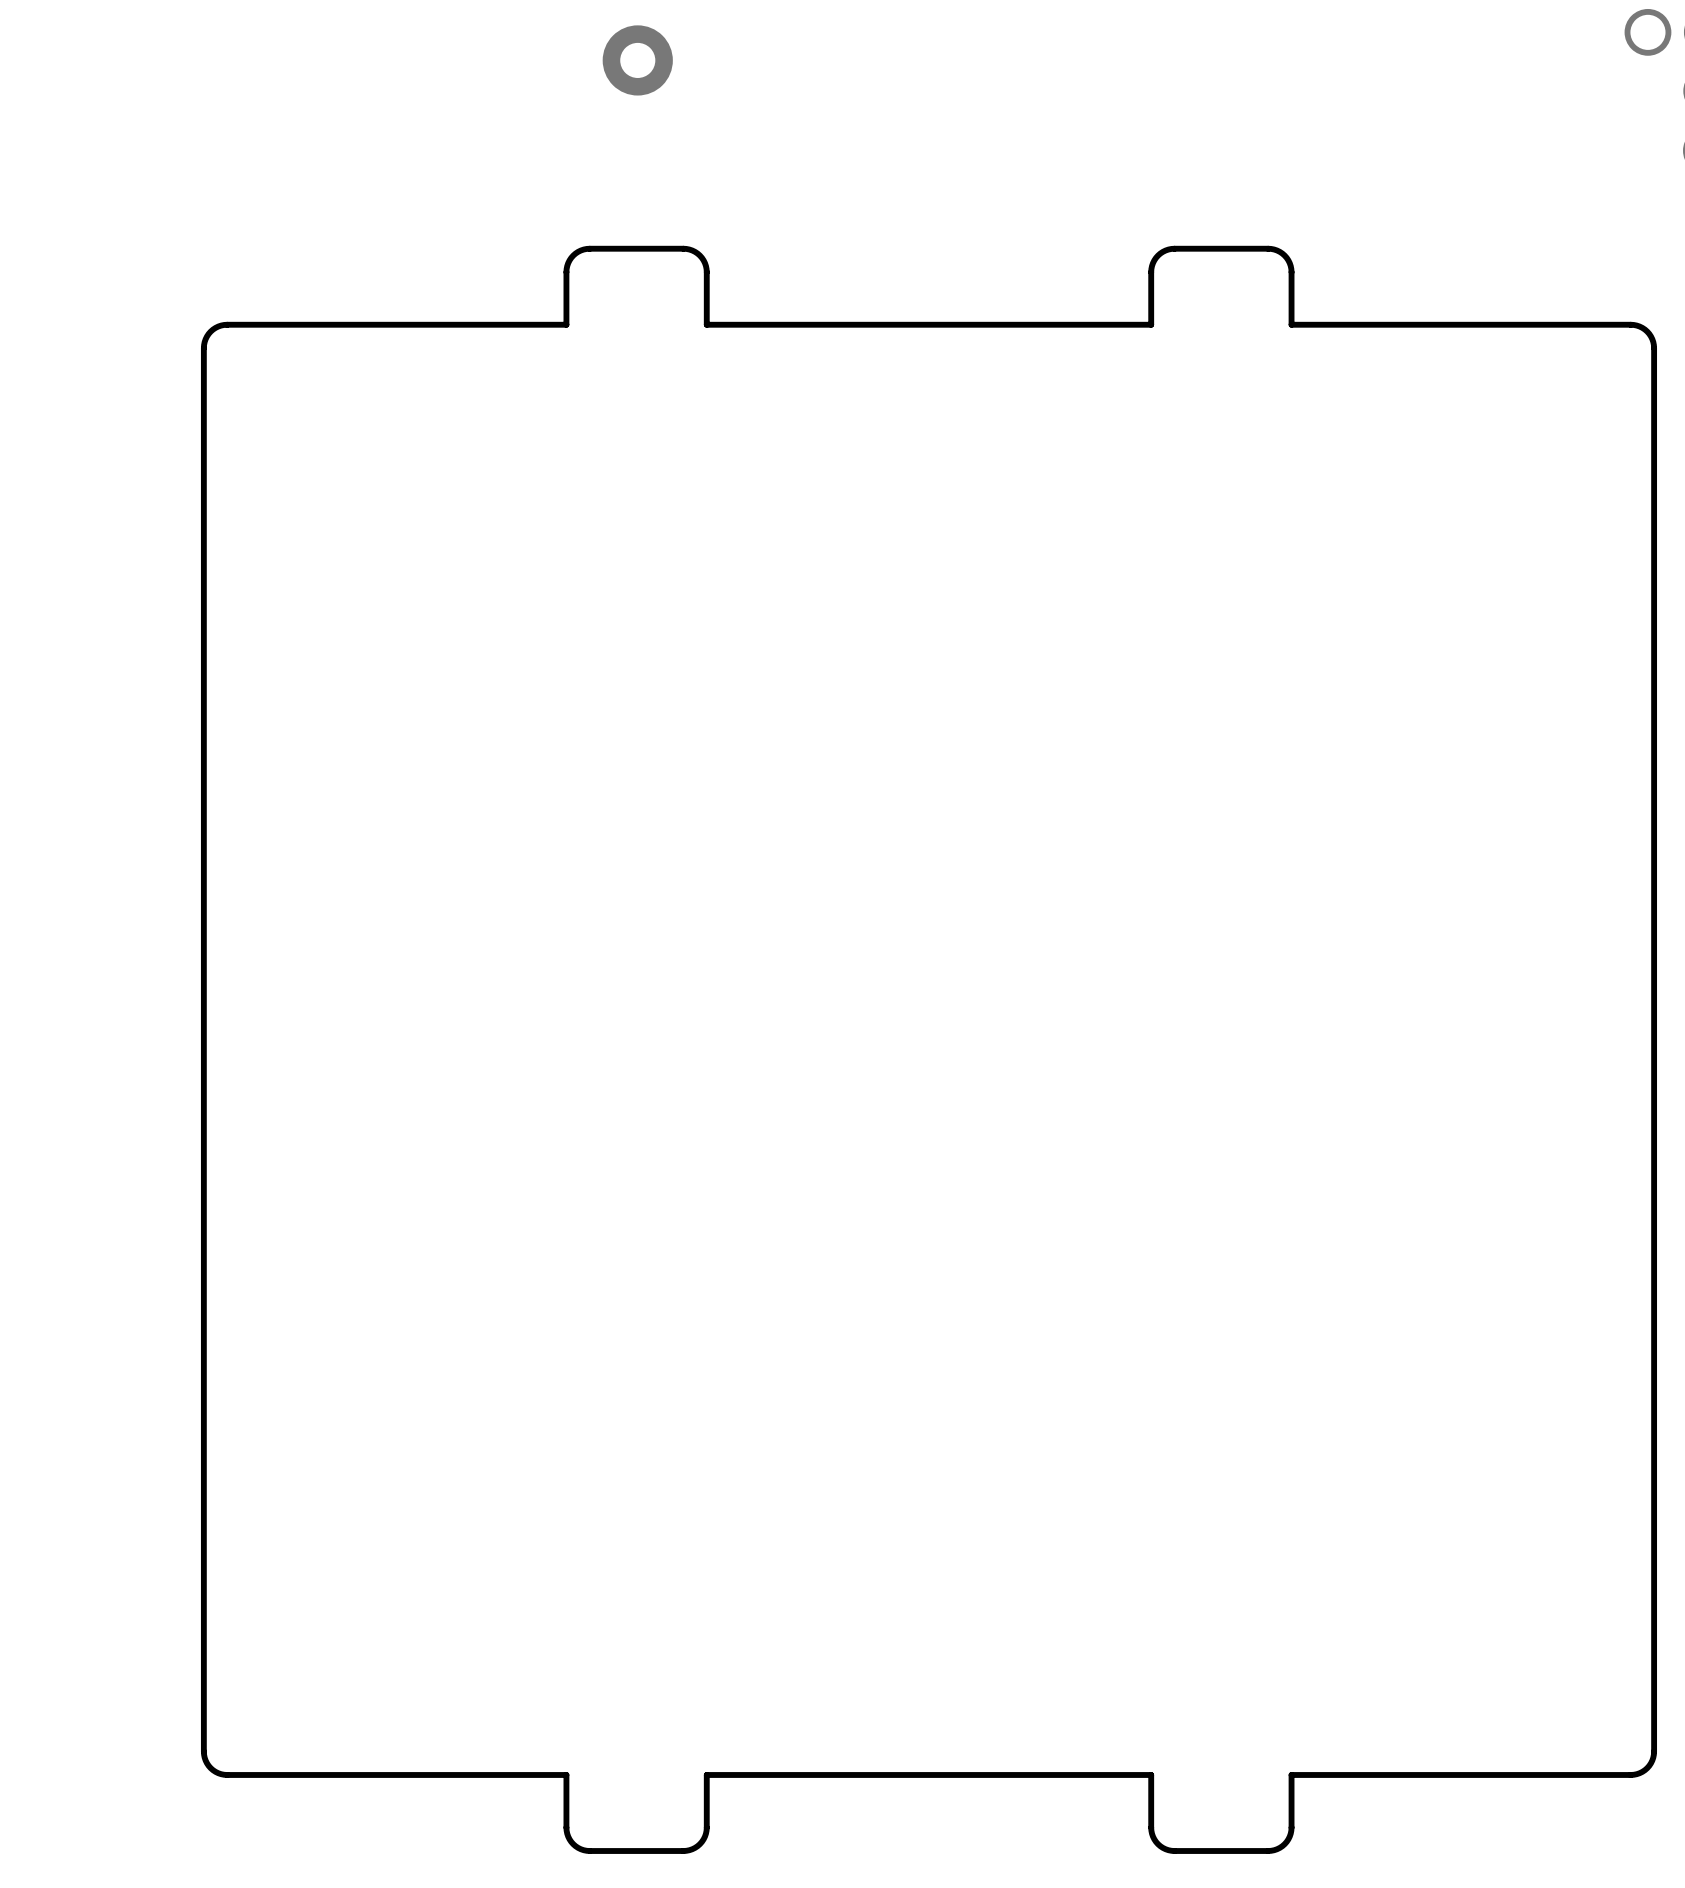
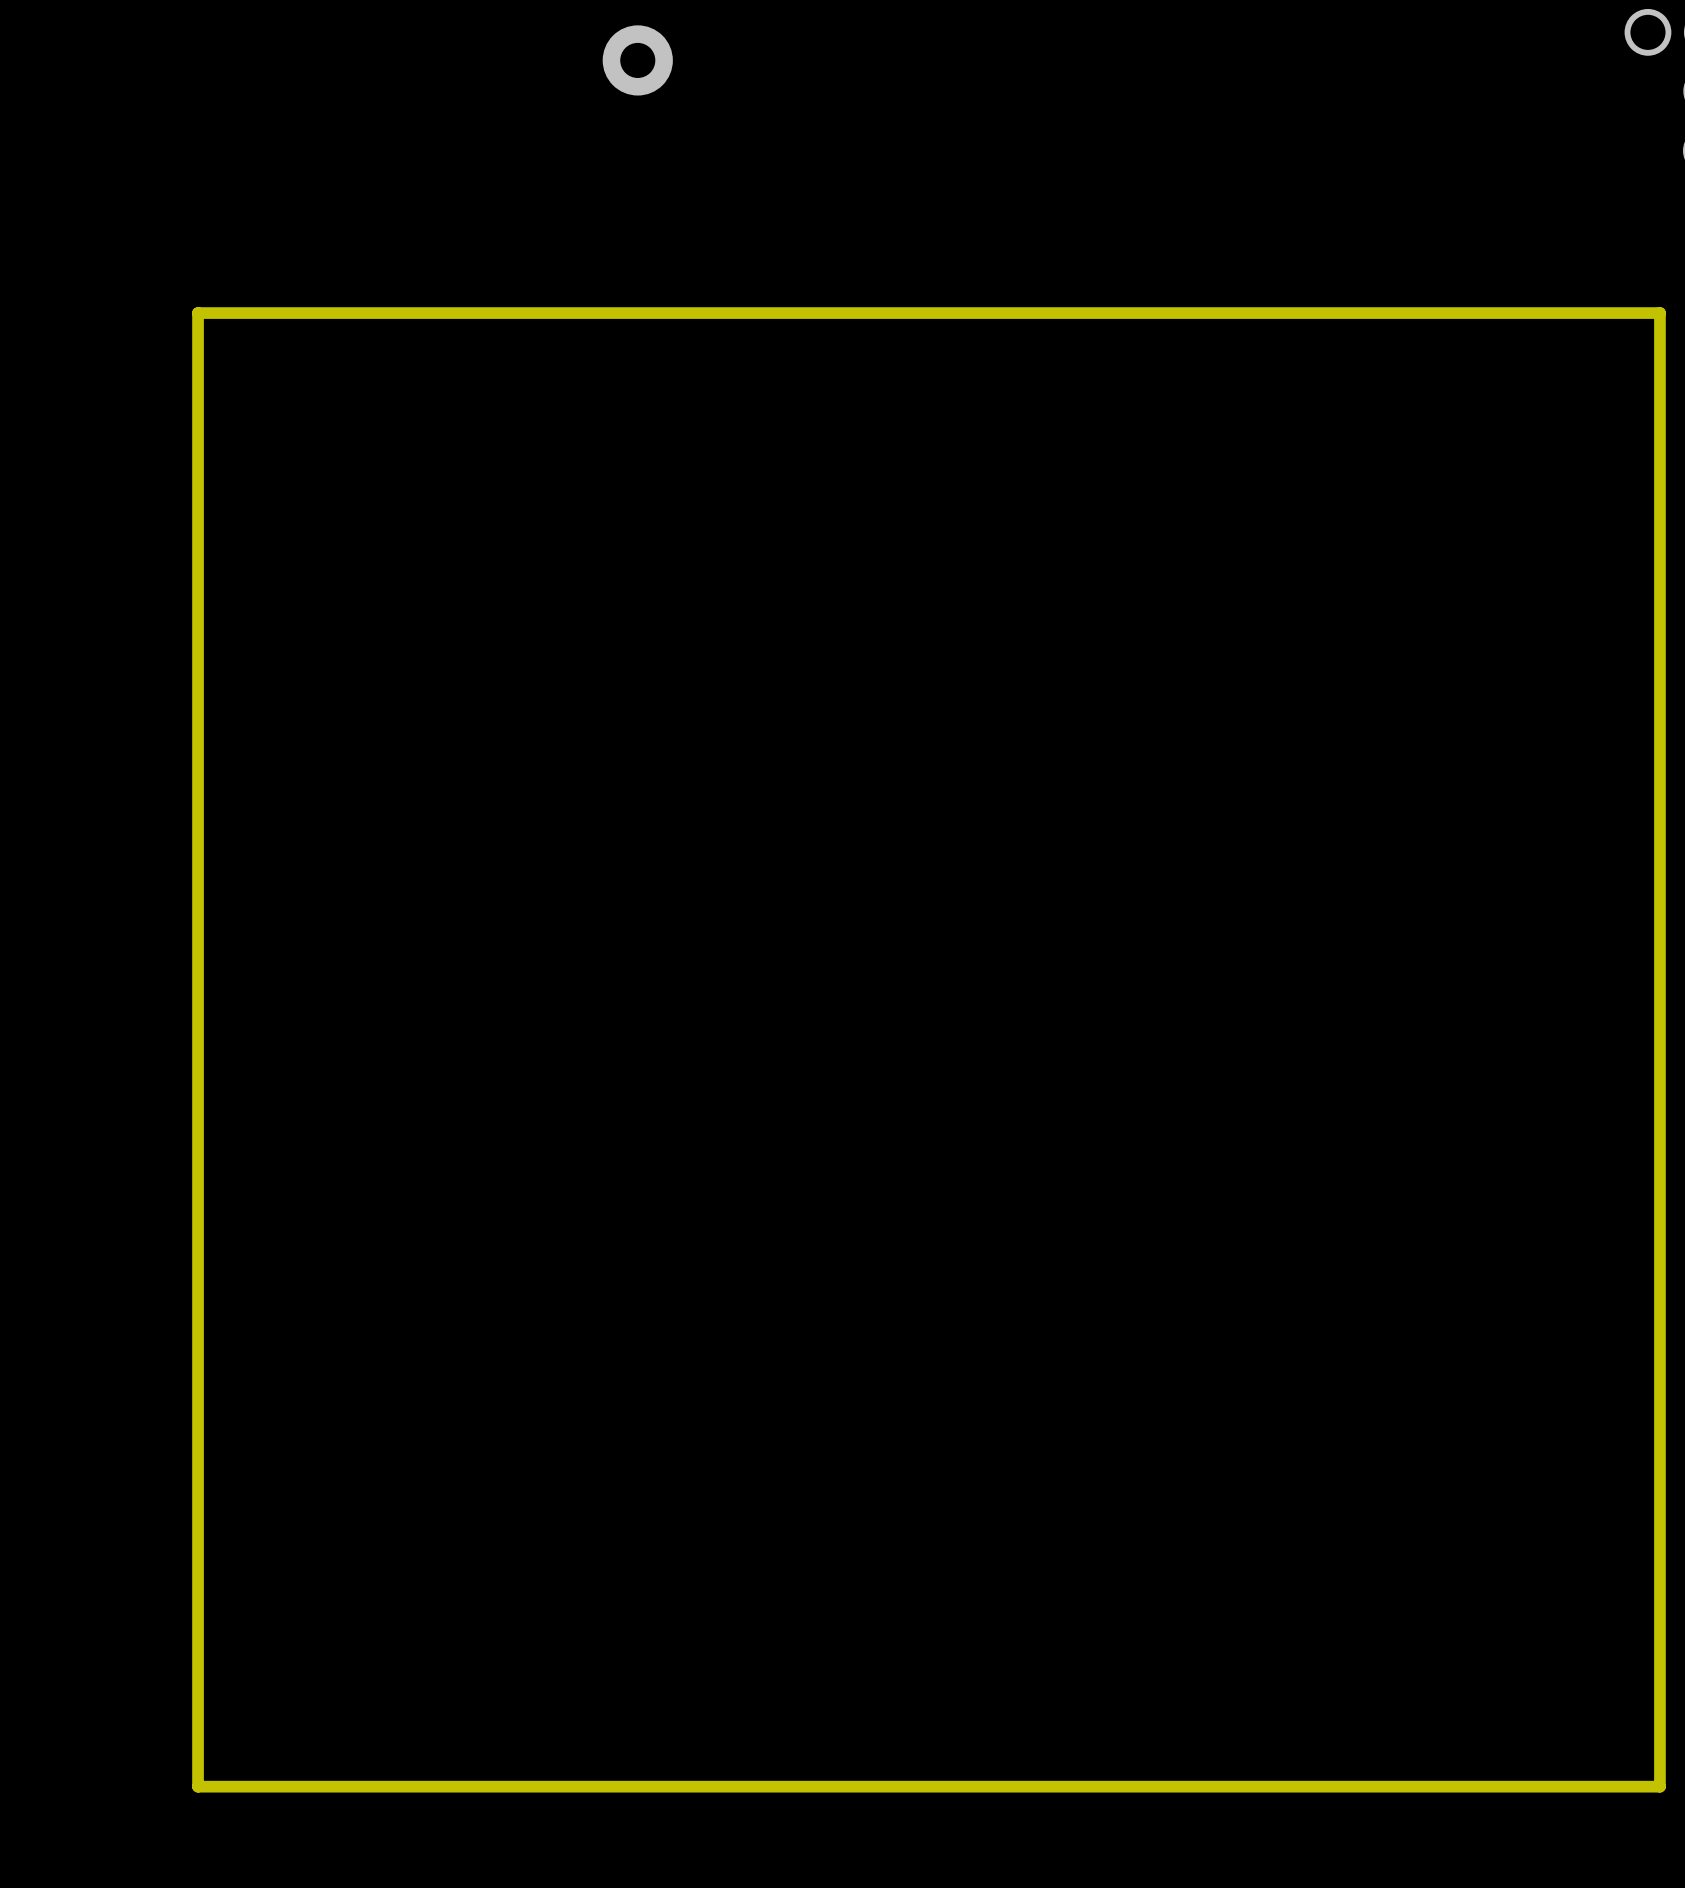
board edge: none -> (198, 313) (1659, 313) (1659, 1786) (198, 1786) (198, 313)
part: (928, 1049) -> none

